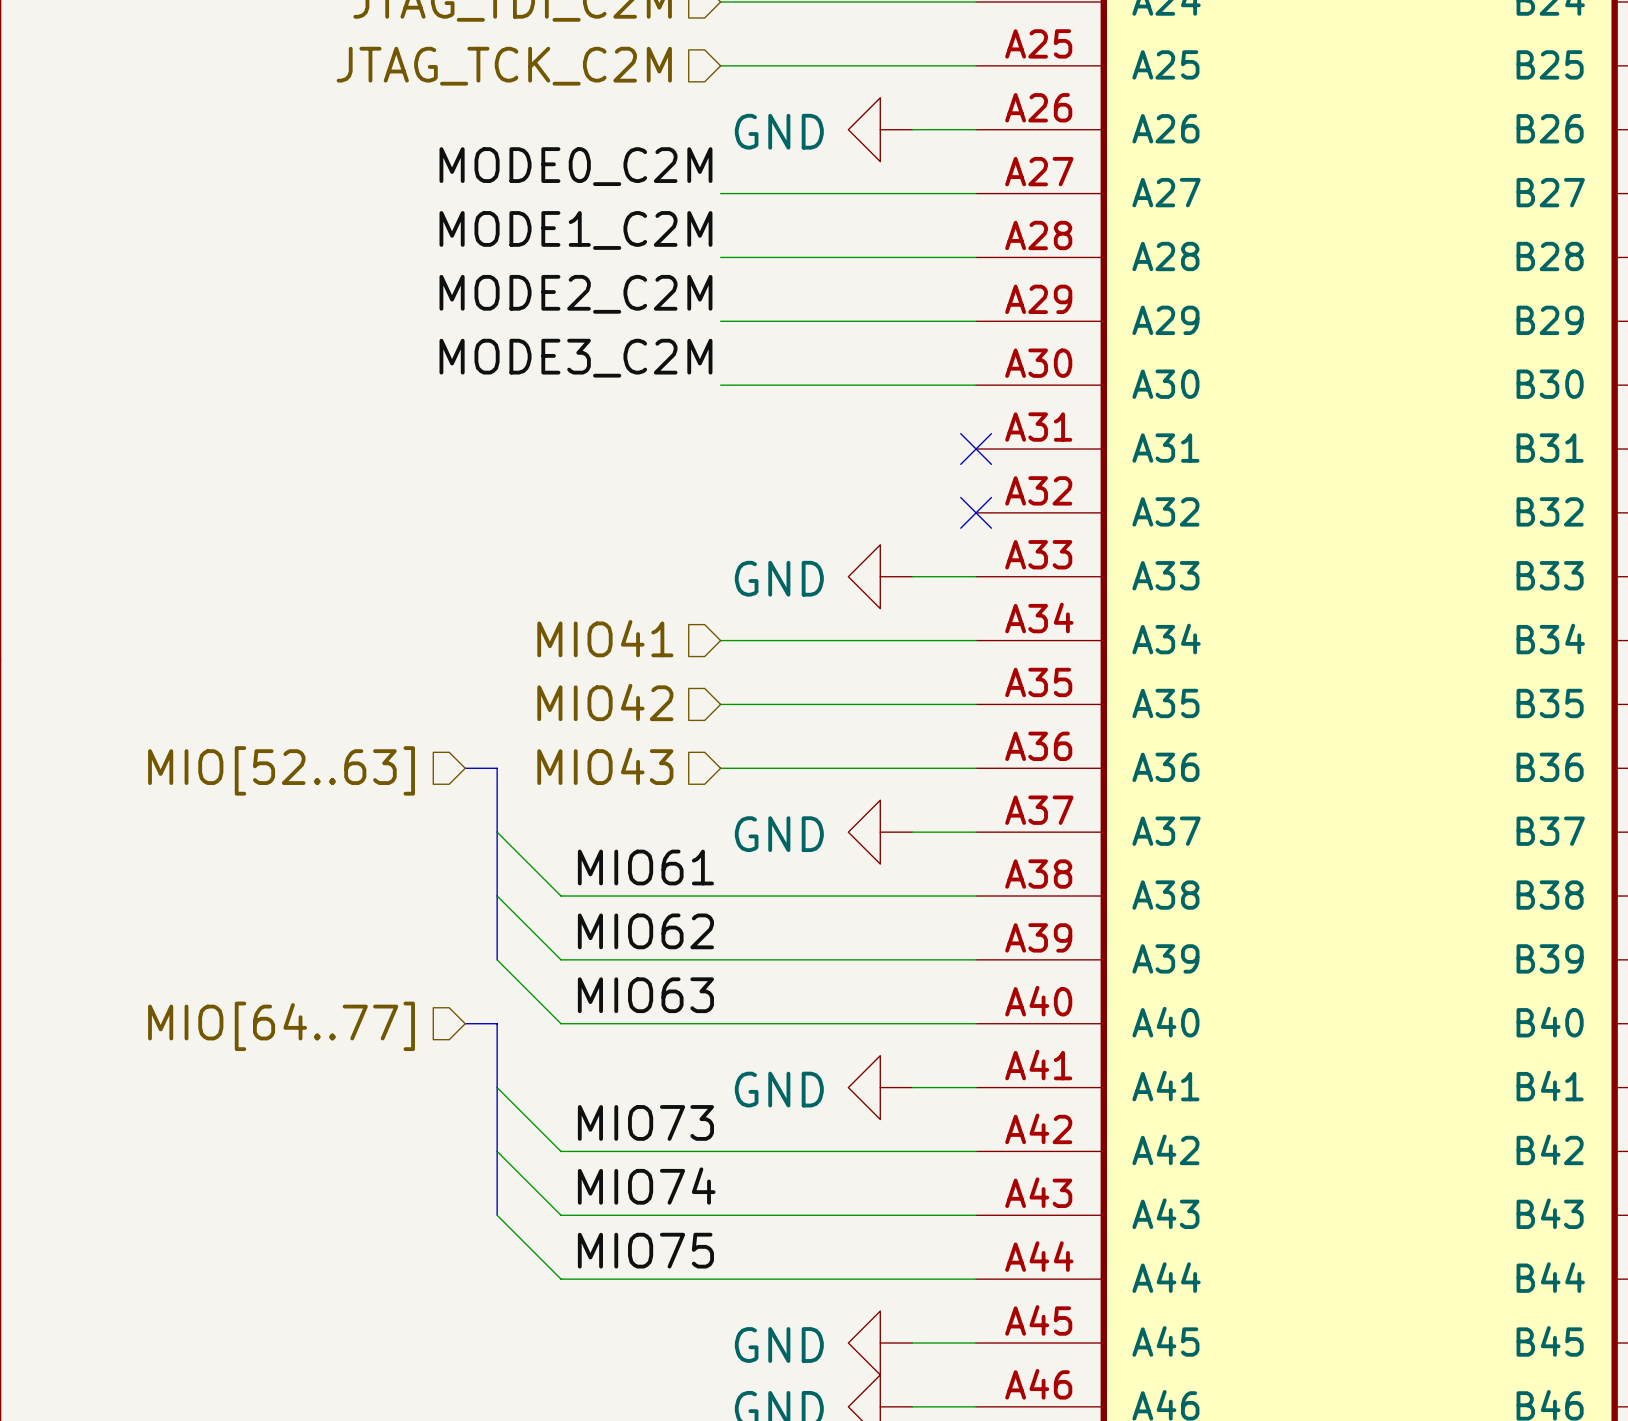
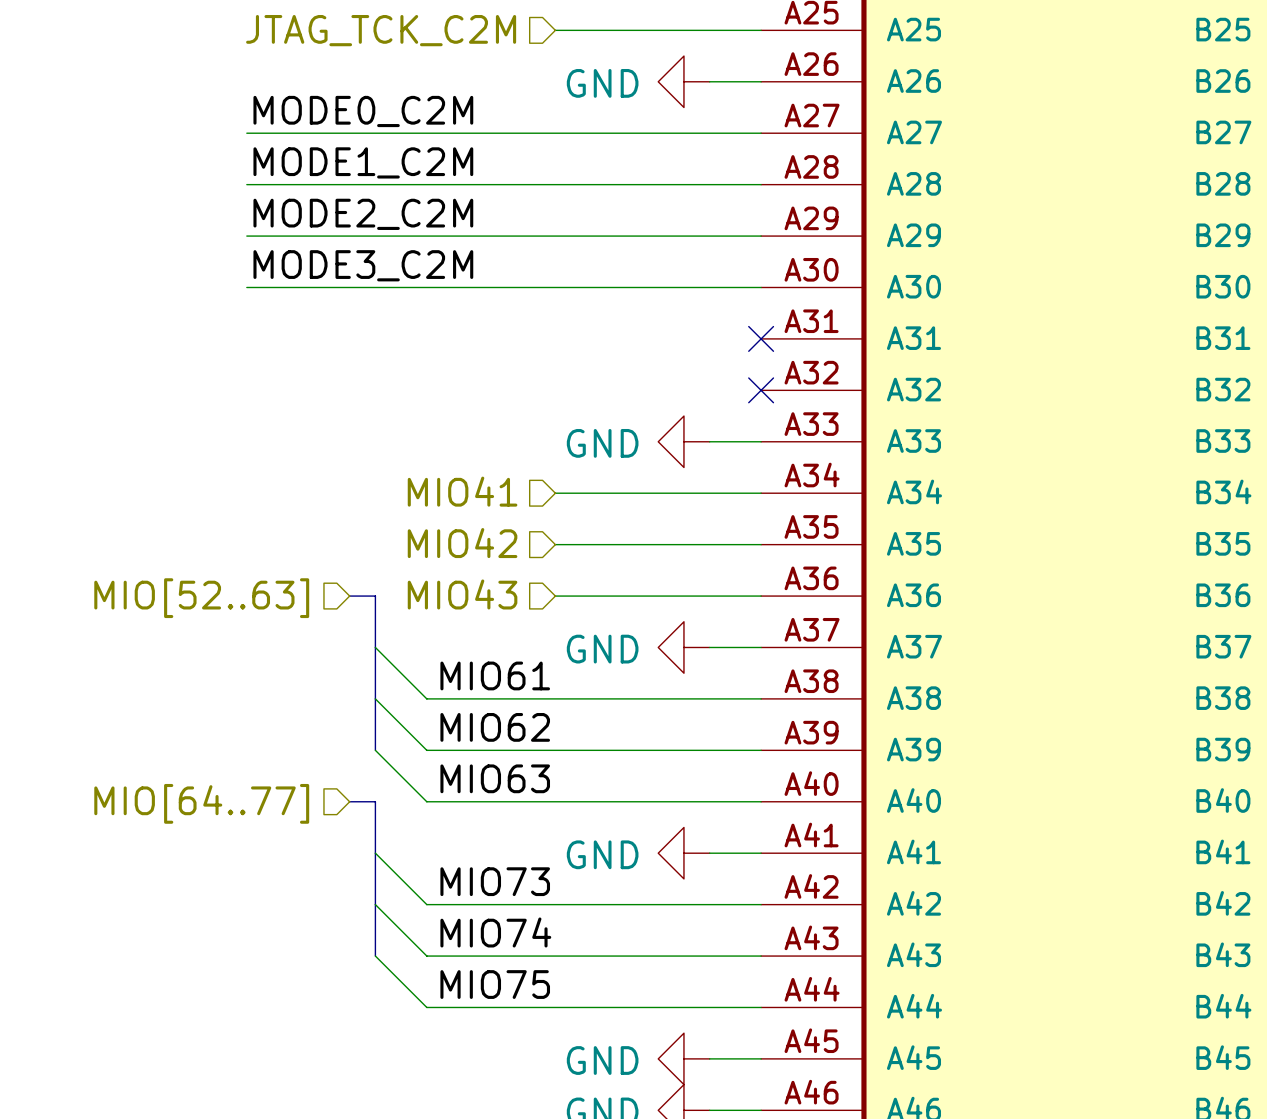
label position: MODE0_C2M (575, 166) -> MODE0_C2M (363, 111)
wire: none -> (246, 133) (555, 133)
label position: MODE1_C2M (575, 230) -> MODE1_C2M (363, 162)
wire: none -> (246, 184) (555, 184)
label position: MODE2_C2M (575, 294) -> MODE2_C2M (363, 214)
wire: none -> (246, 236) (555, 236)
label position: MODE3_C2M (575, 358) -> MODE3_C2M (363, 265)
wire: none -> (246, 287) (555, 287)

